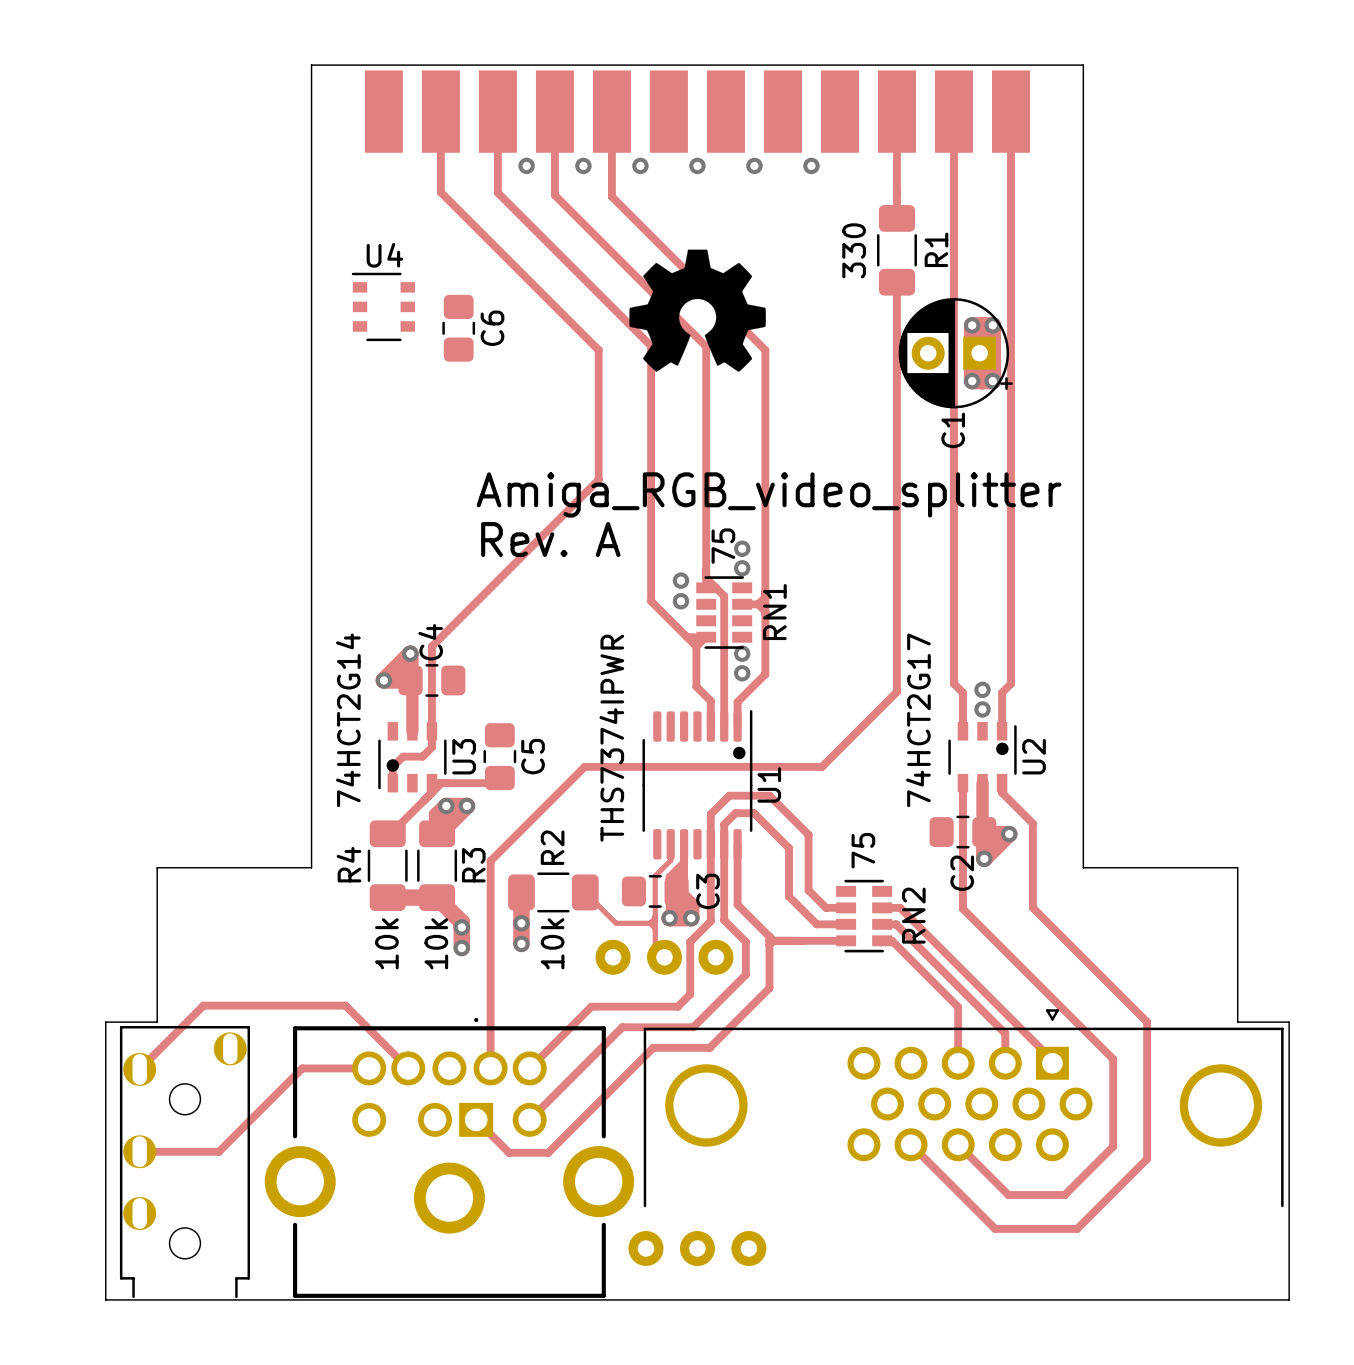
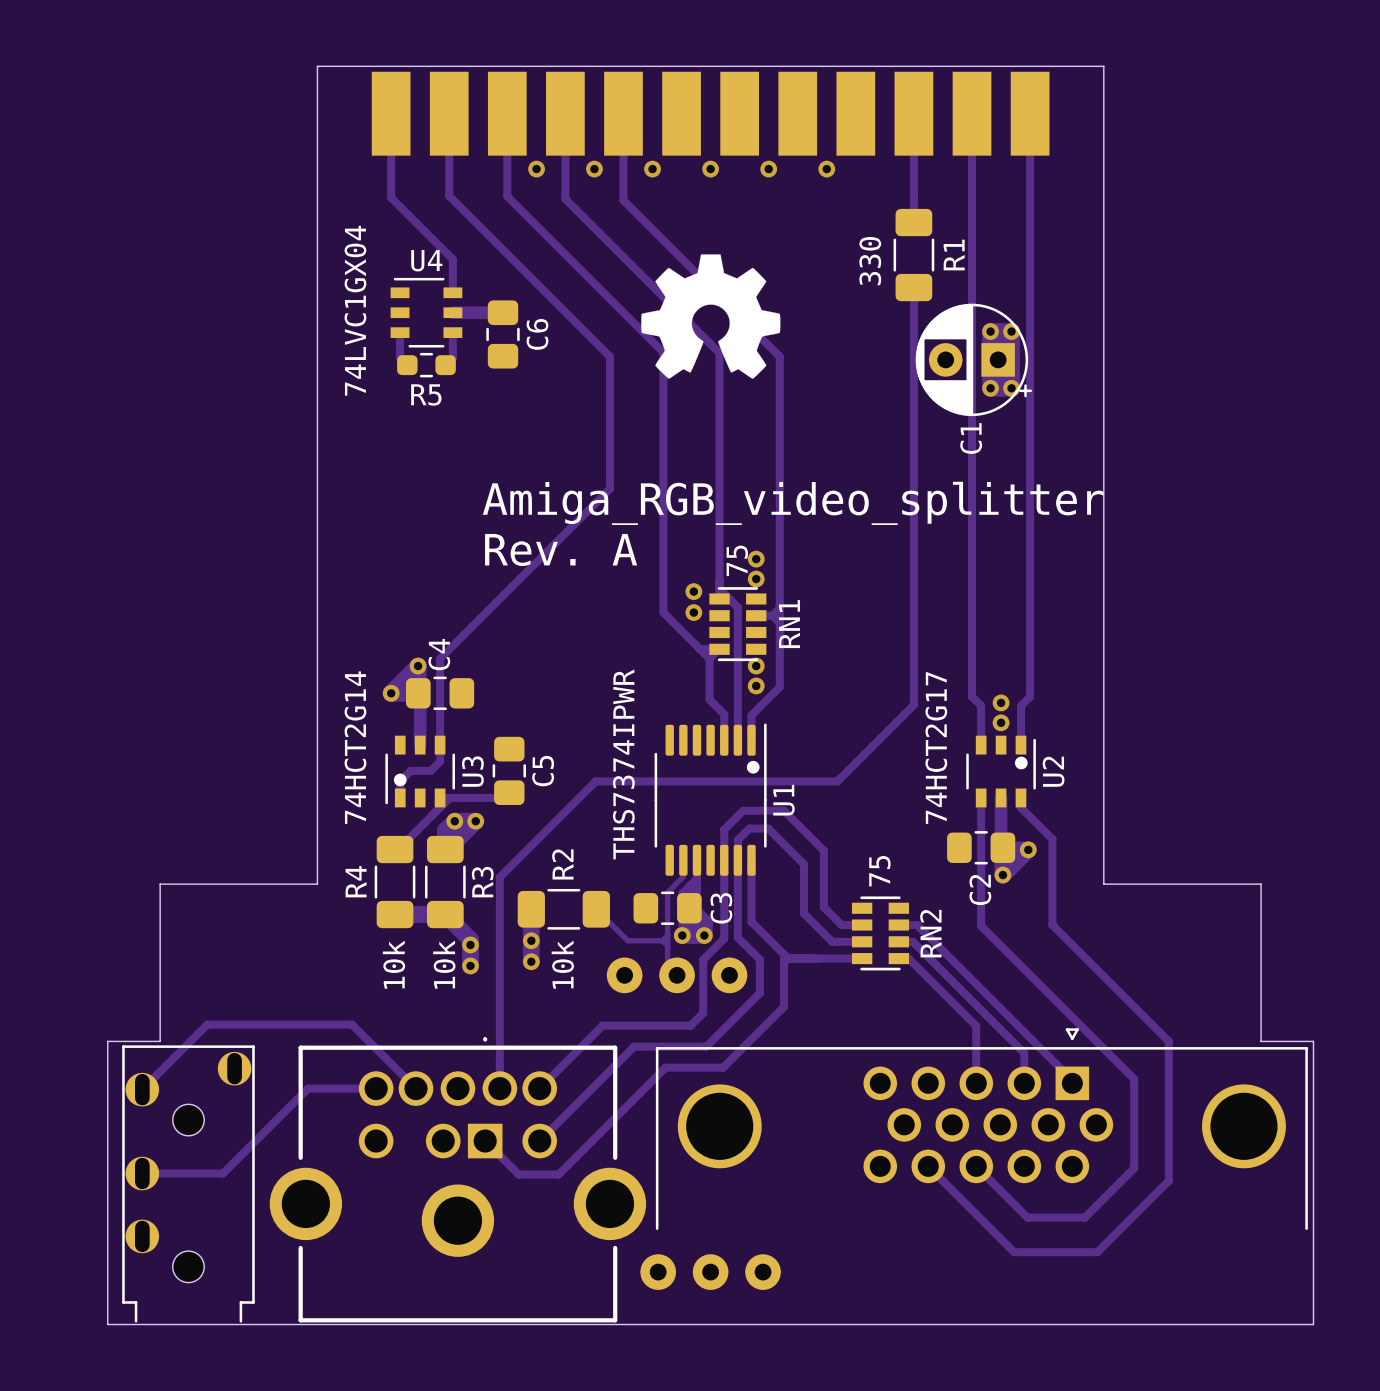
track: none -> (391, 113) (391, 197) (452, 259) (452, 292)
U4 footprint: [351, 272, 415, 342] -> [390, 277, 463, 348]
text: none -> 74LVC1GX04 (355, 310)
track: none -> (452, 312) (503, 312)
track: none -> (400, 332) (400, 357) (407, 365)
track: none -> (452, 332) (452, 357) (445, 365)
C6 position: (458, 328) -> (503, 334)
R5: none -> (426, 365)

